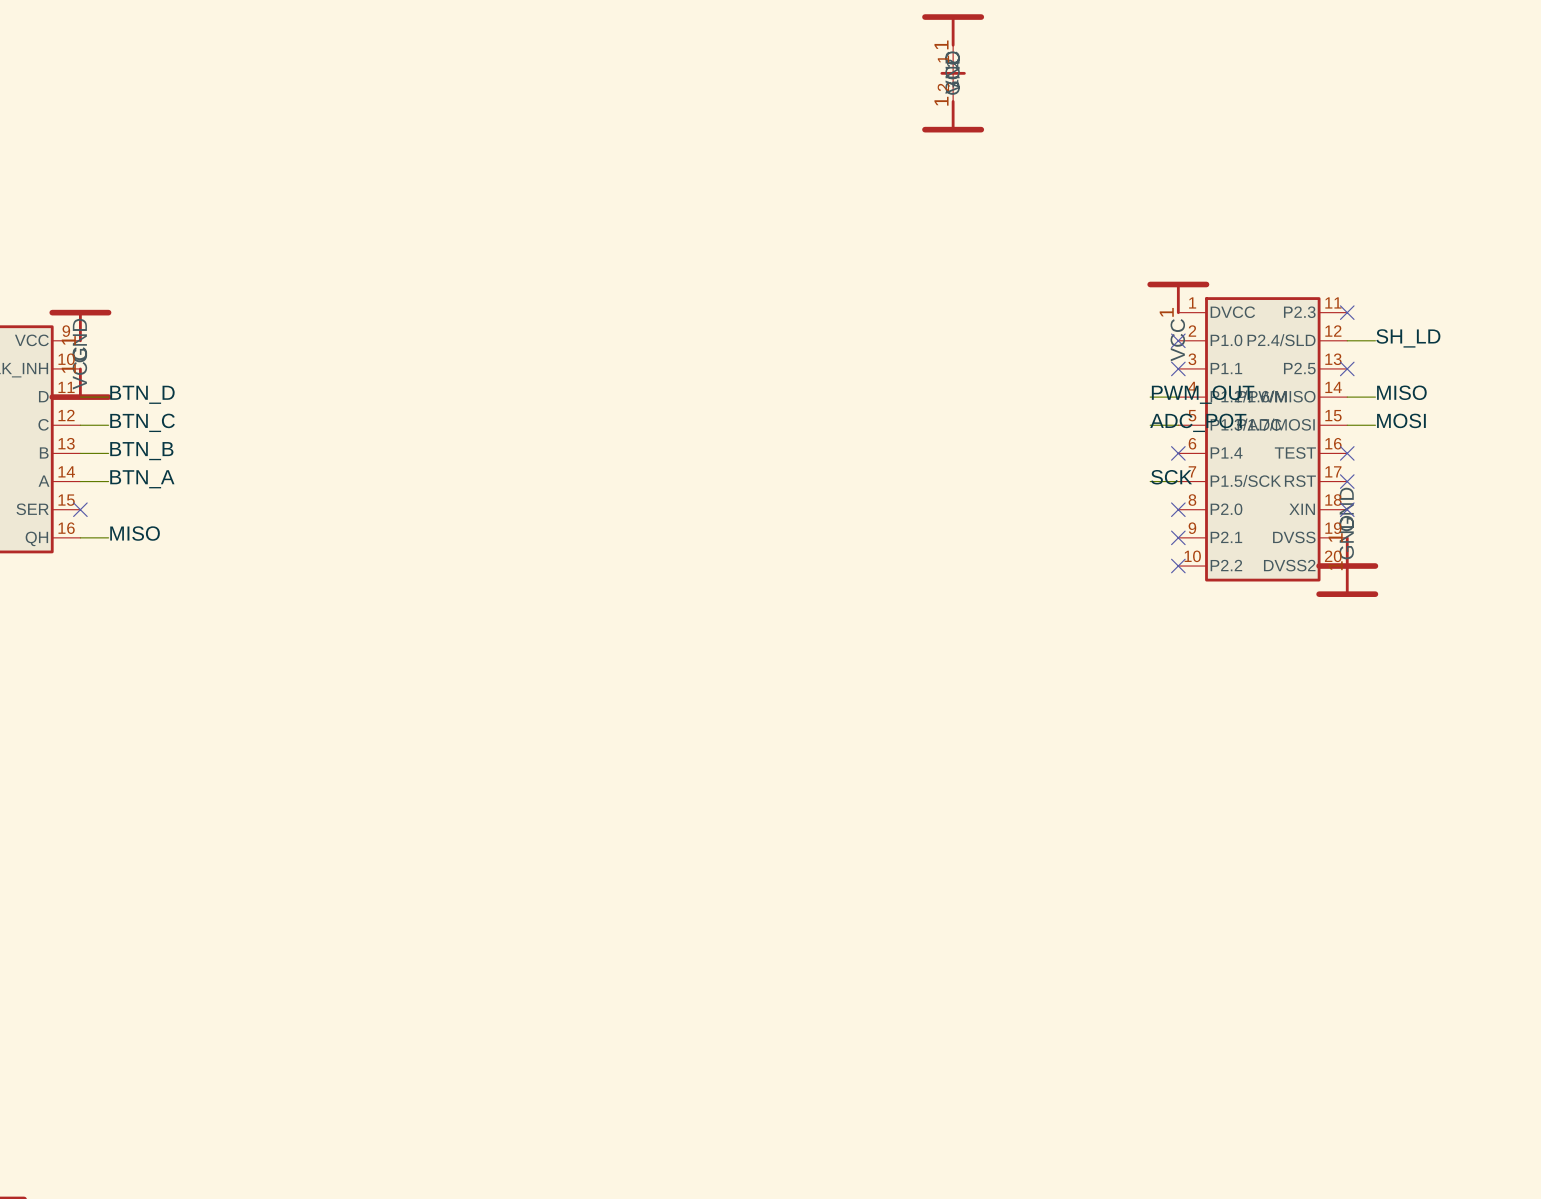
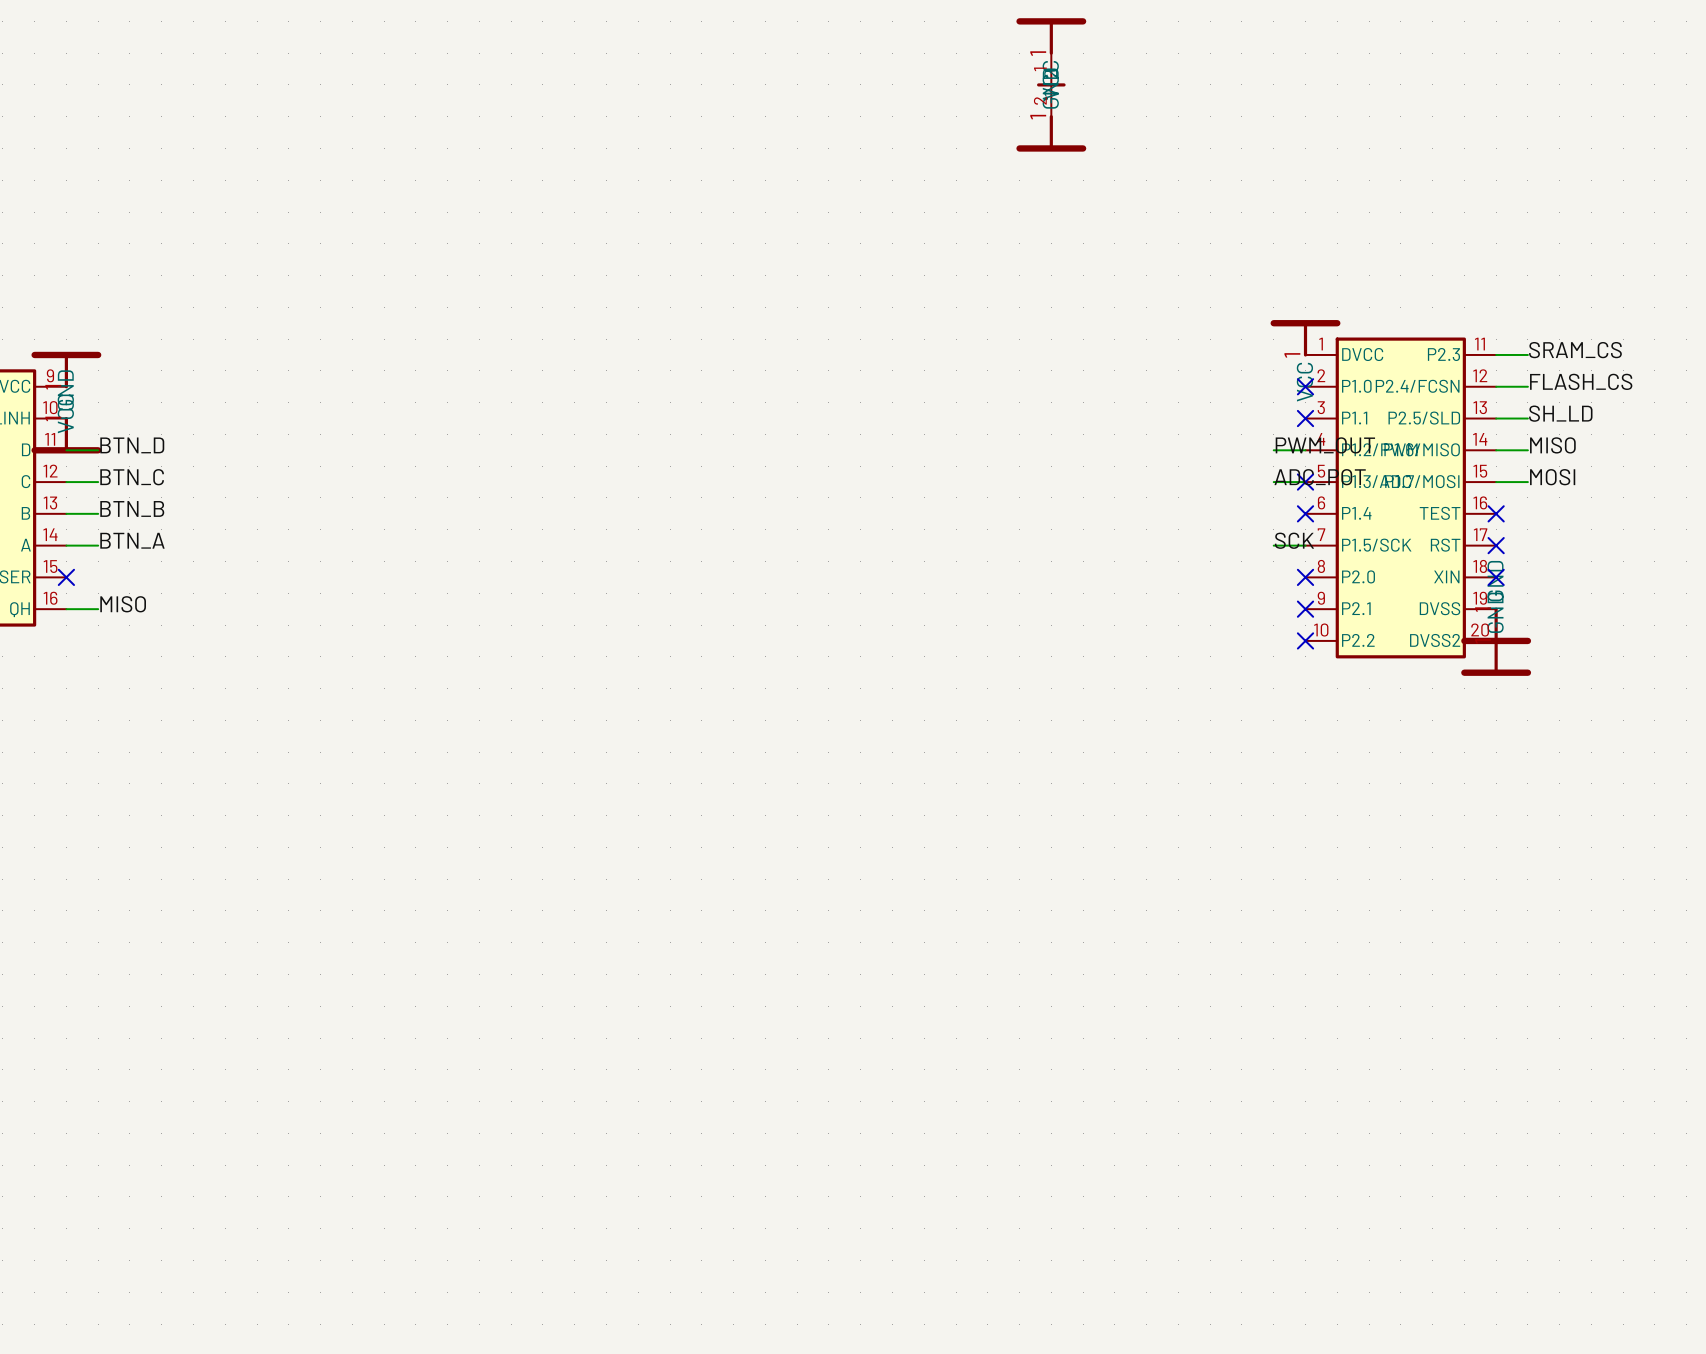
label: none -> SRAM_CS (1575, 350)
wire: none -> (1496, 354) (1527, 354)
no-connect mark: (1347, 312) -> none
label: SH_LD (1408, 338) -> FLASH_CS (1581, 381)
part pin name: P2.4/SLD (1281, 340) -> P2.4/FCSN (1417, 386)
label: none -> SH_LD (1560, 413)
part pin name: P2.5 (1299, 368) -> P2.5/SLD (1424, 418)
wire: none -> (1496, 418) (1527, 418)
no-connect mark: (1347, 368) -> none
no-connect mark: none -> (1305, 482)

